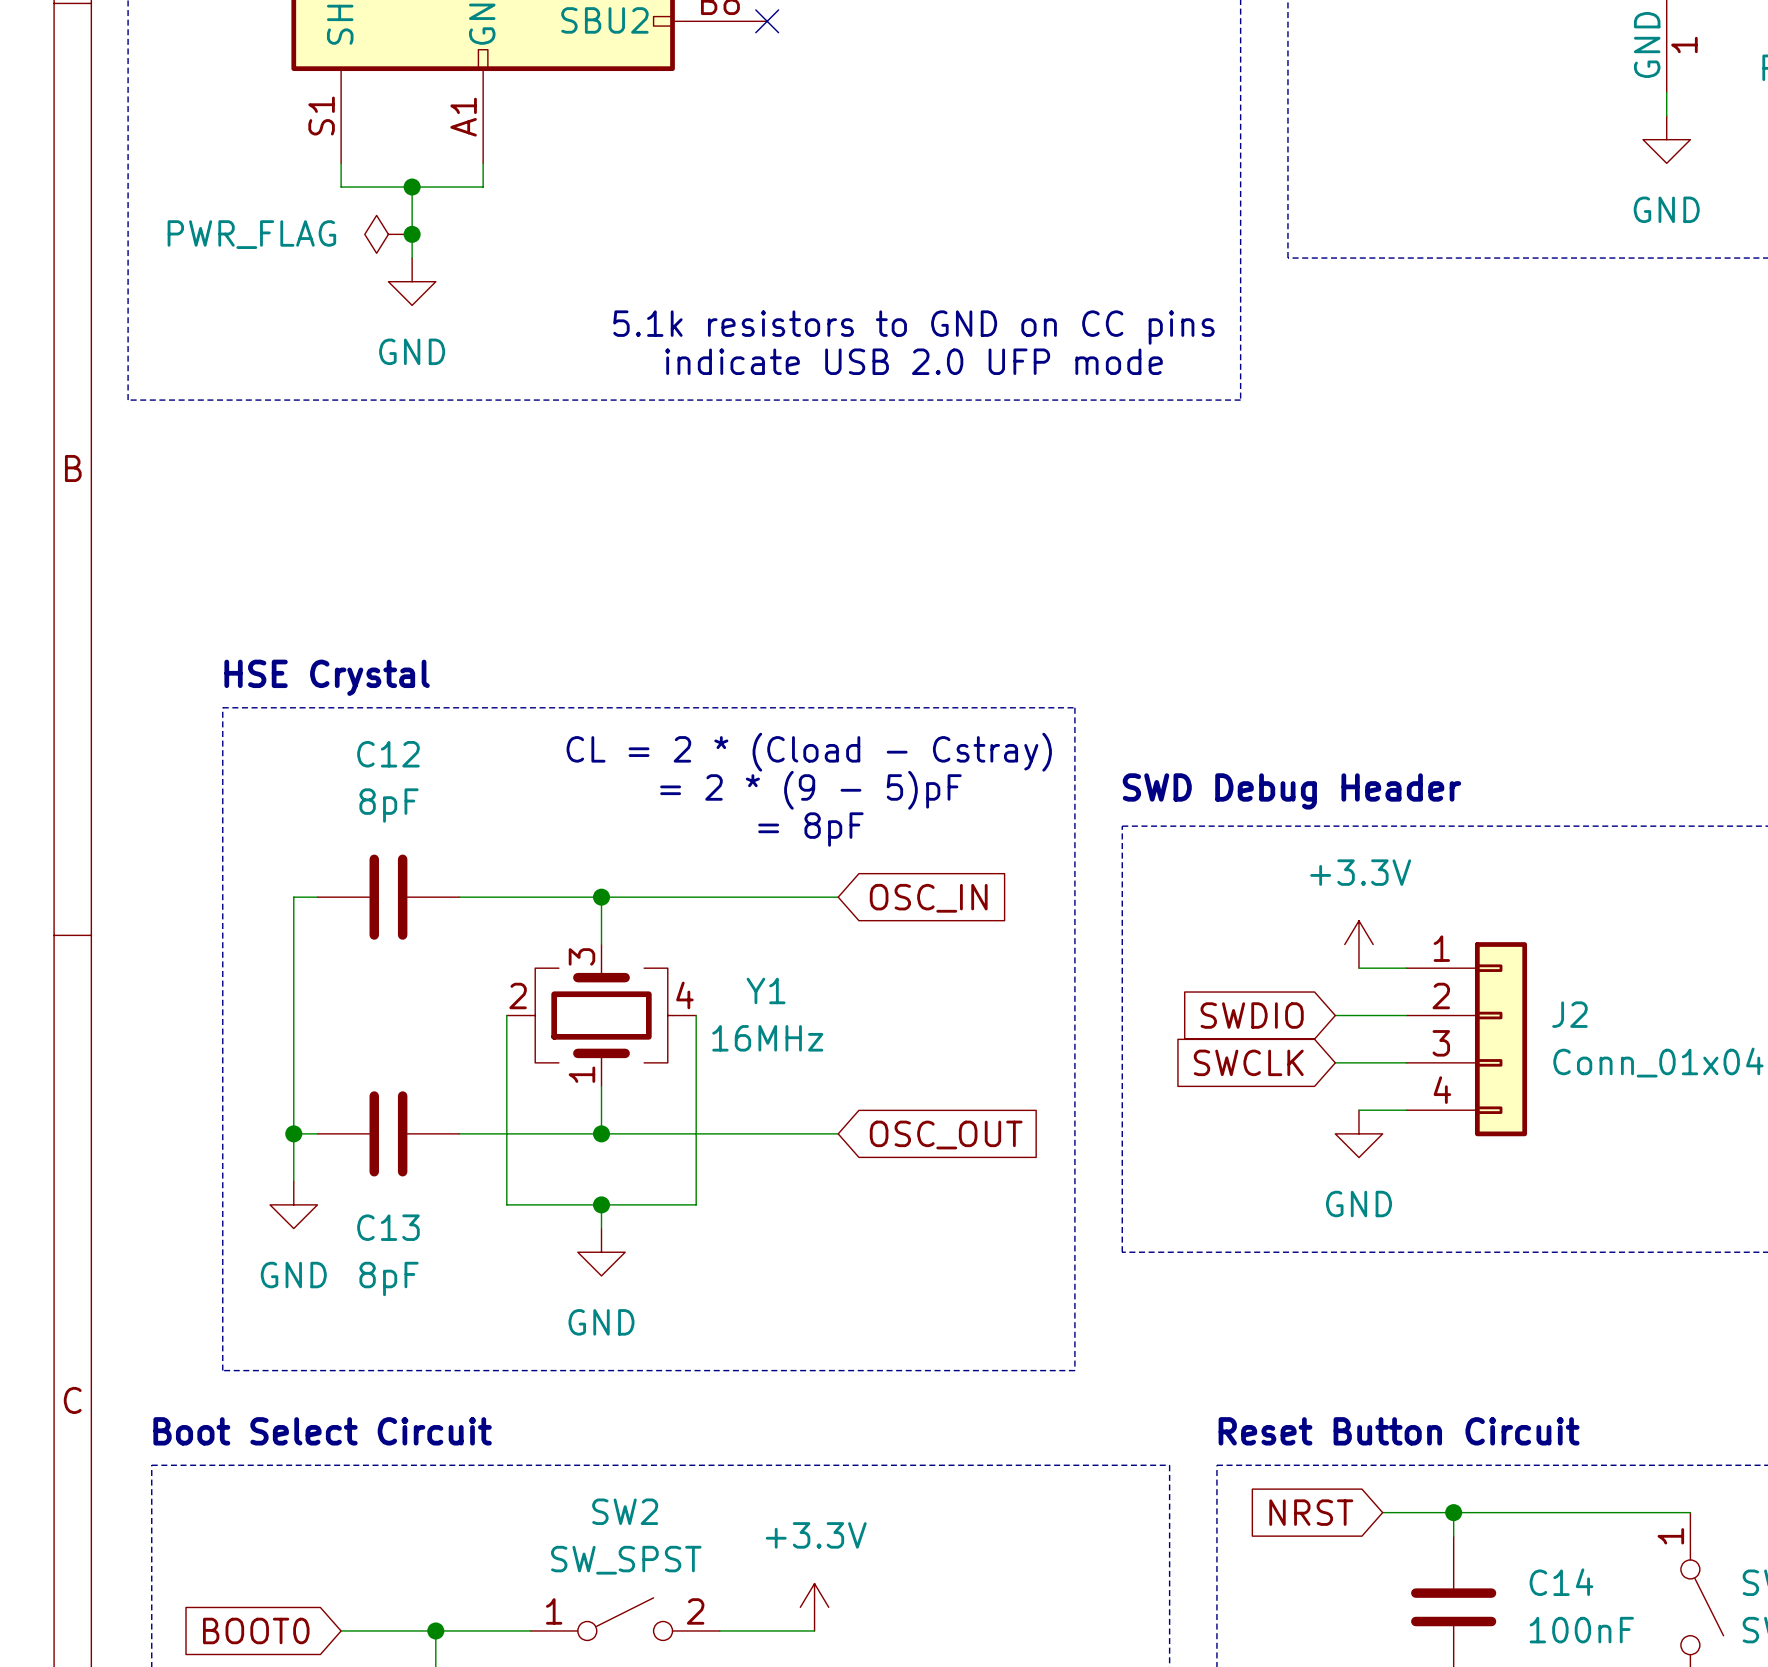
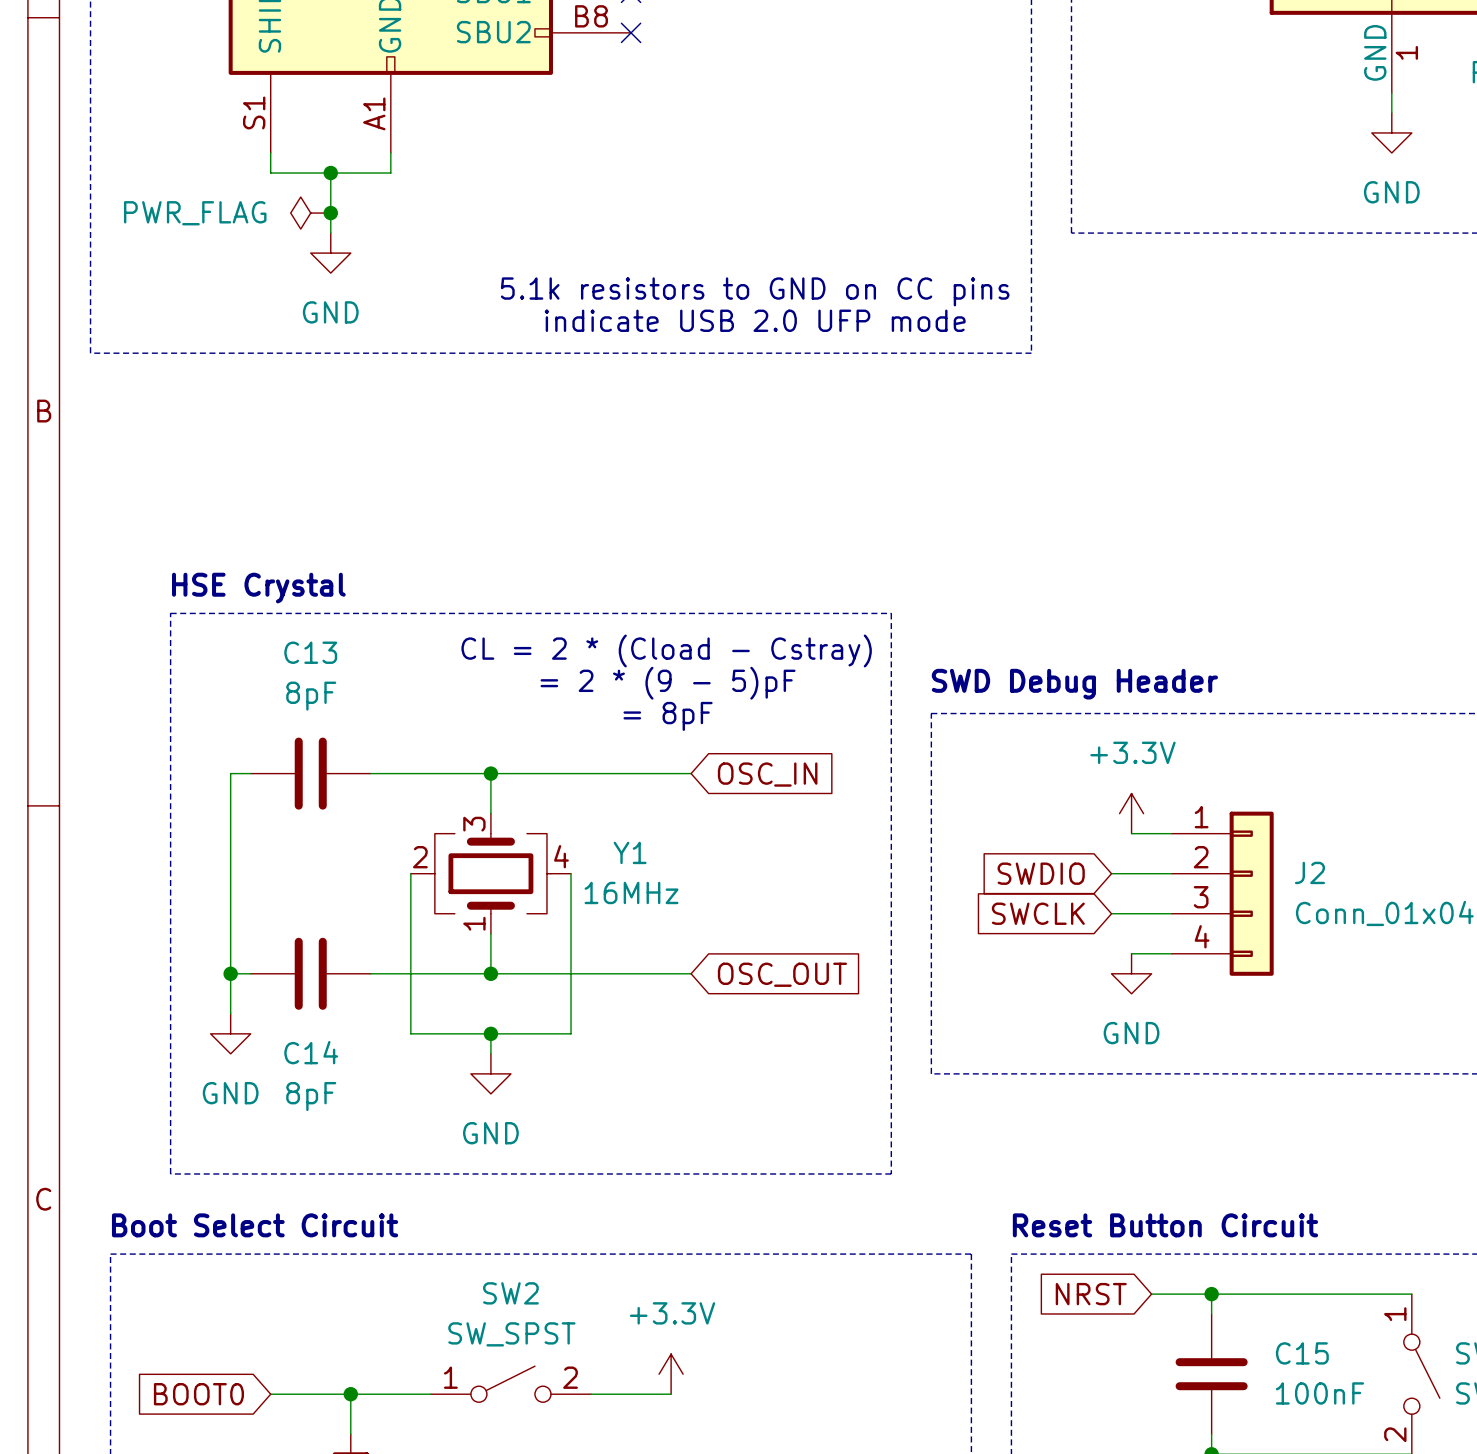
C12 name: C12 (388, 754) -> C13 (310, 652)
C13 name: C13 (388, 1227) -> C14 (311, 1052)
C14 name: C14 (1561, 1582) -> C15 (1302, 1353)

